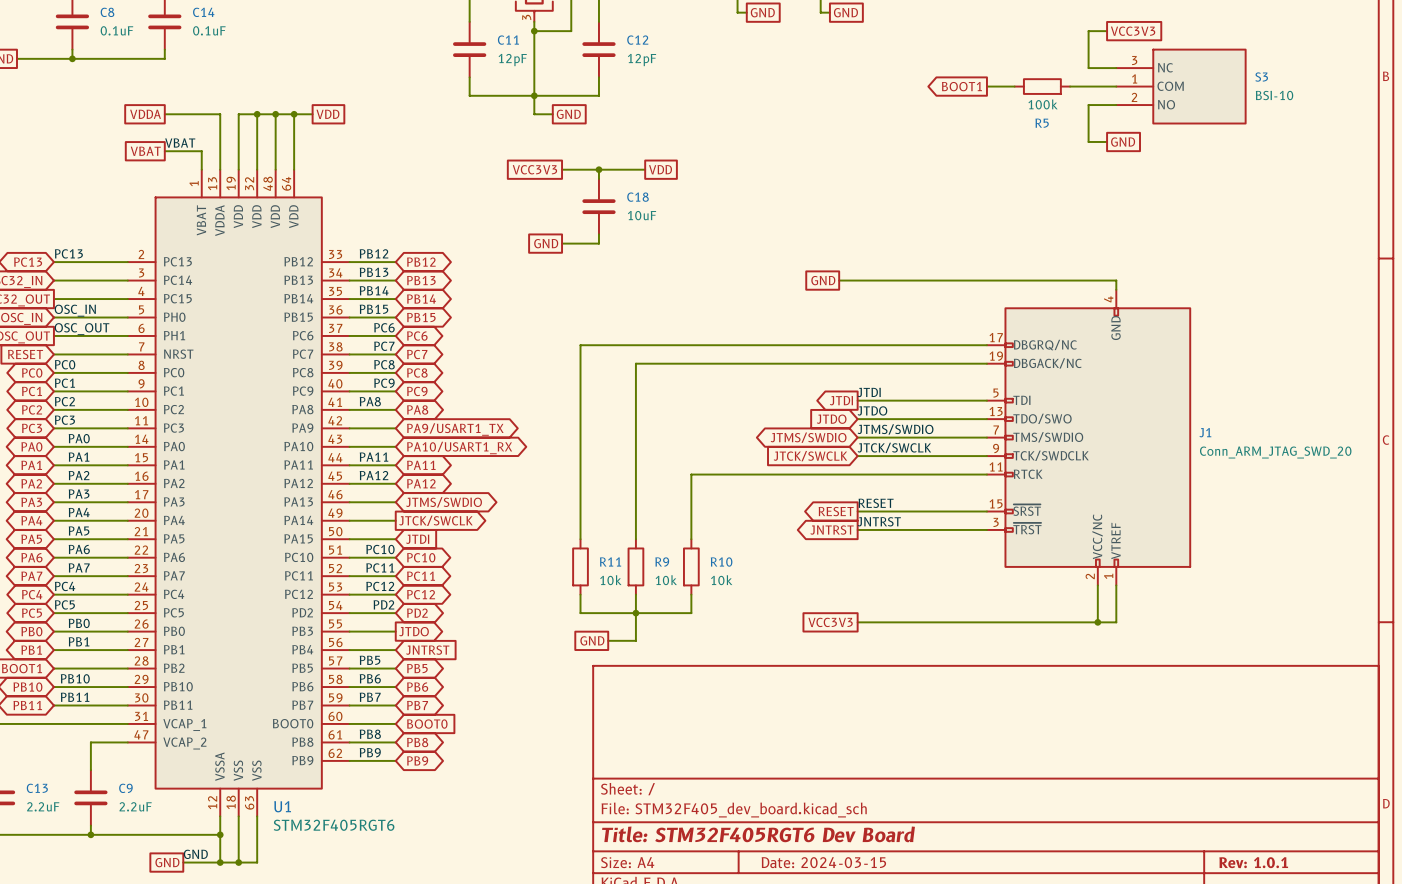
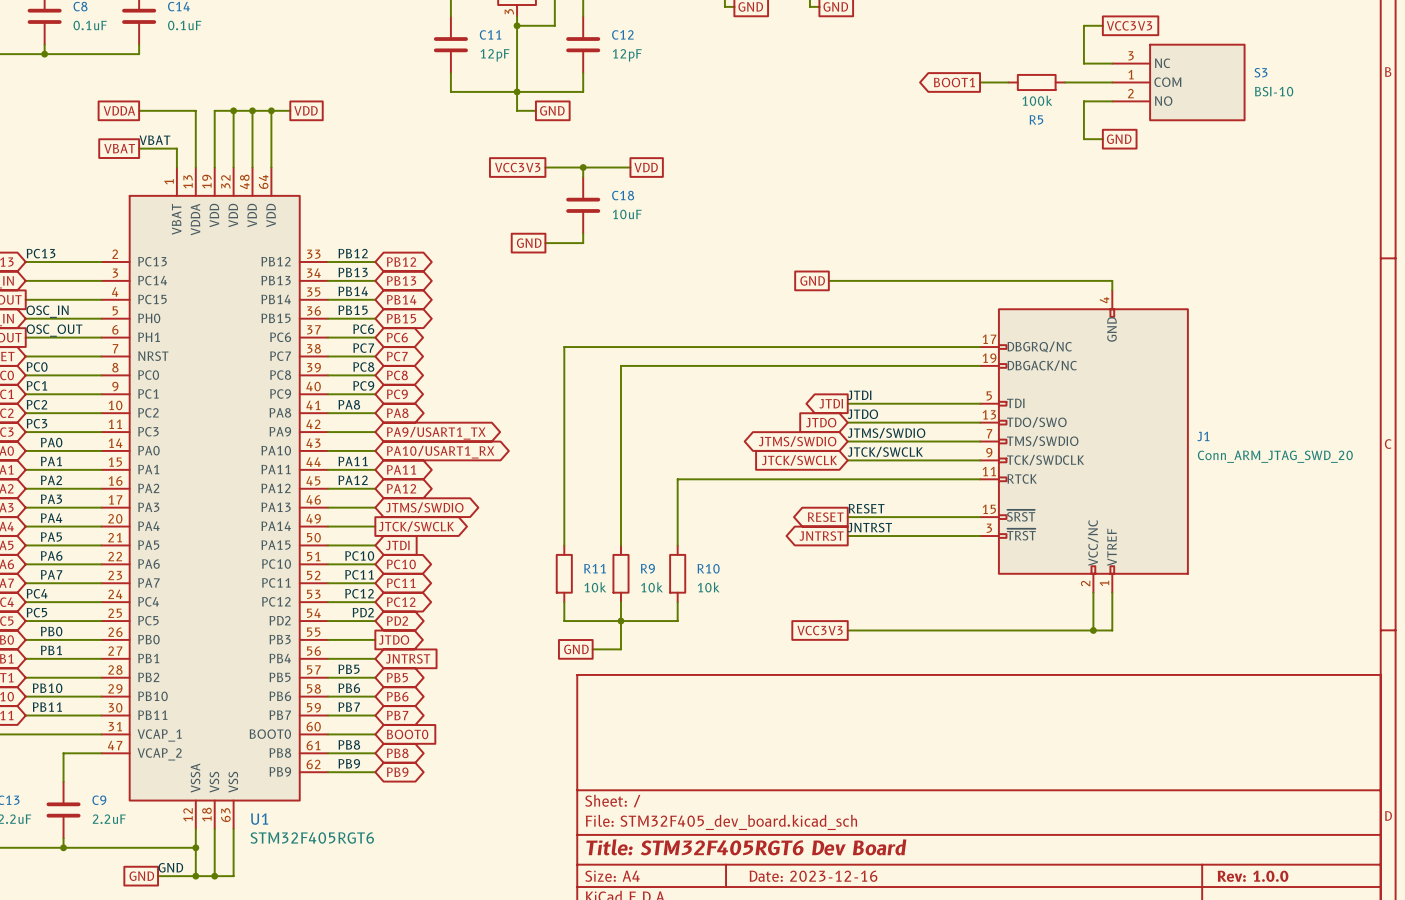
title block: Date: 2024-03-15 (823, 862) -> Date: 2023-12-16 (813, 876)
title block: Rev: 1.0.1 (1253, 862) -> Rev: 1.0.0 (1253, 876)

